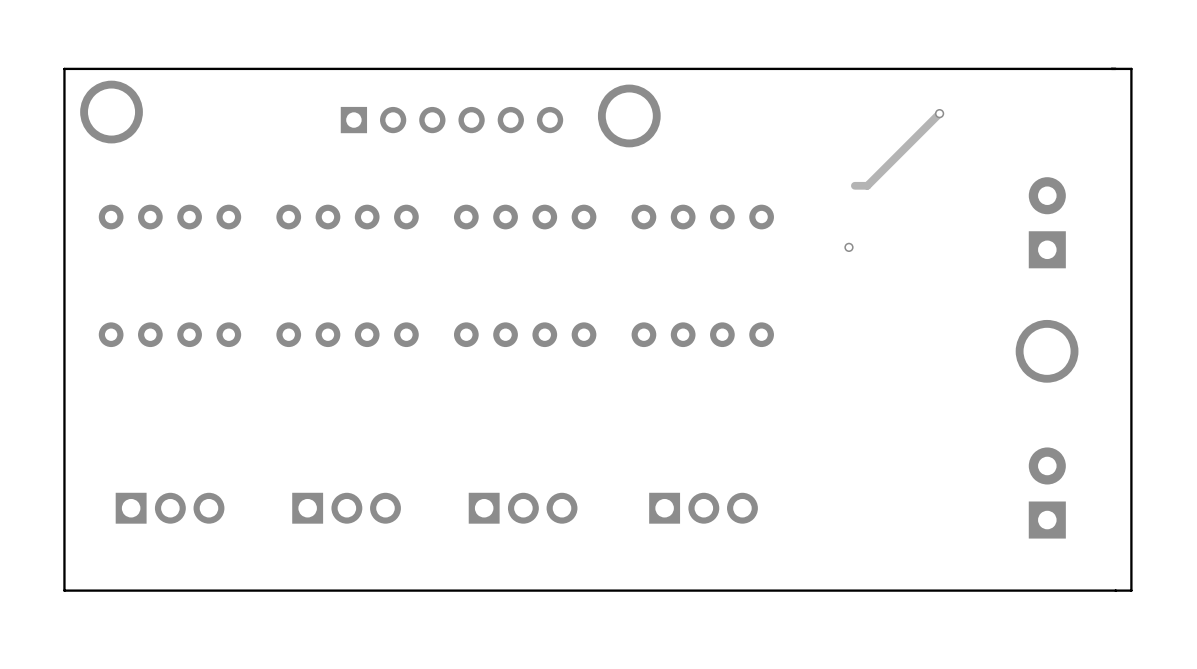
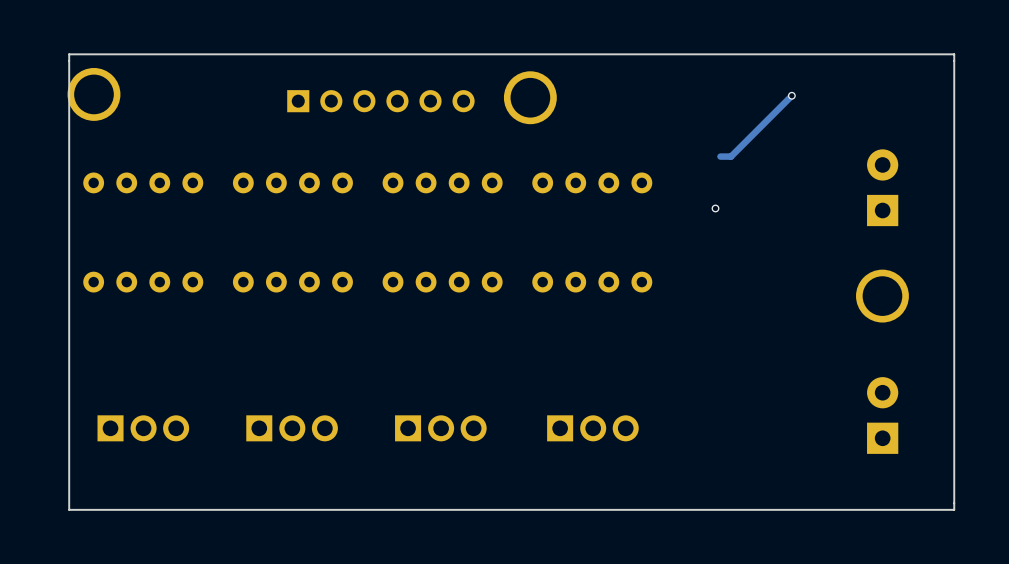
board edge: (1131, 68) (1131, 590) (64, 590) (64, 68) (1131, 68) -> (954, 54) (954, 509) (69, 509) (69, 54) (954, 54)

